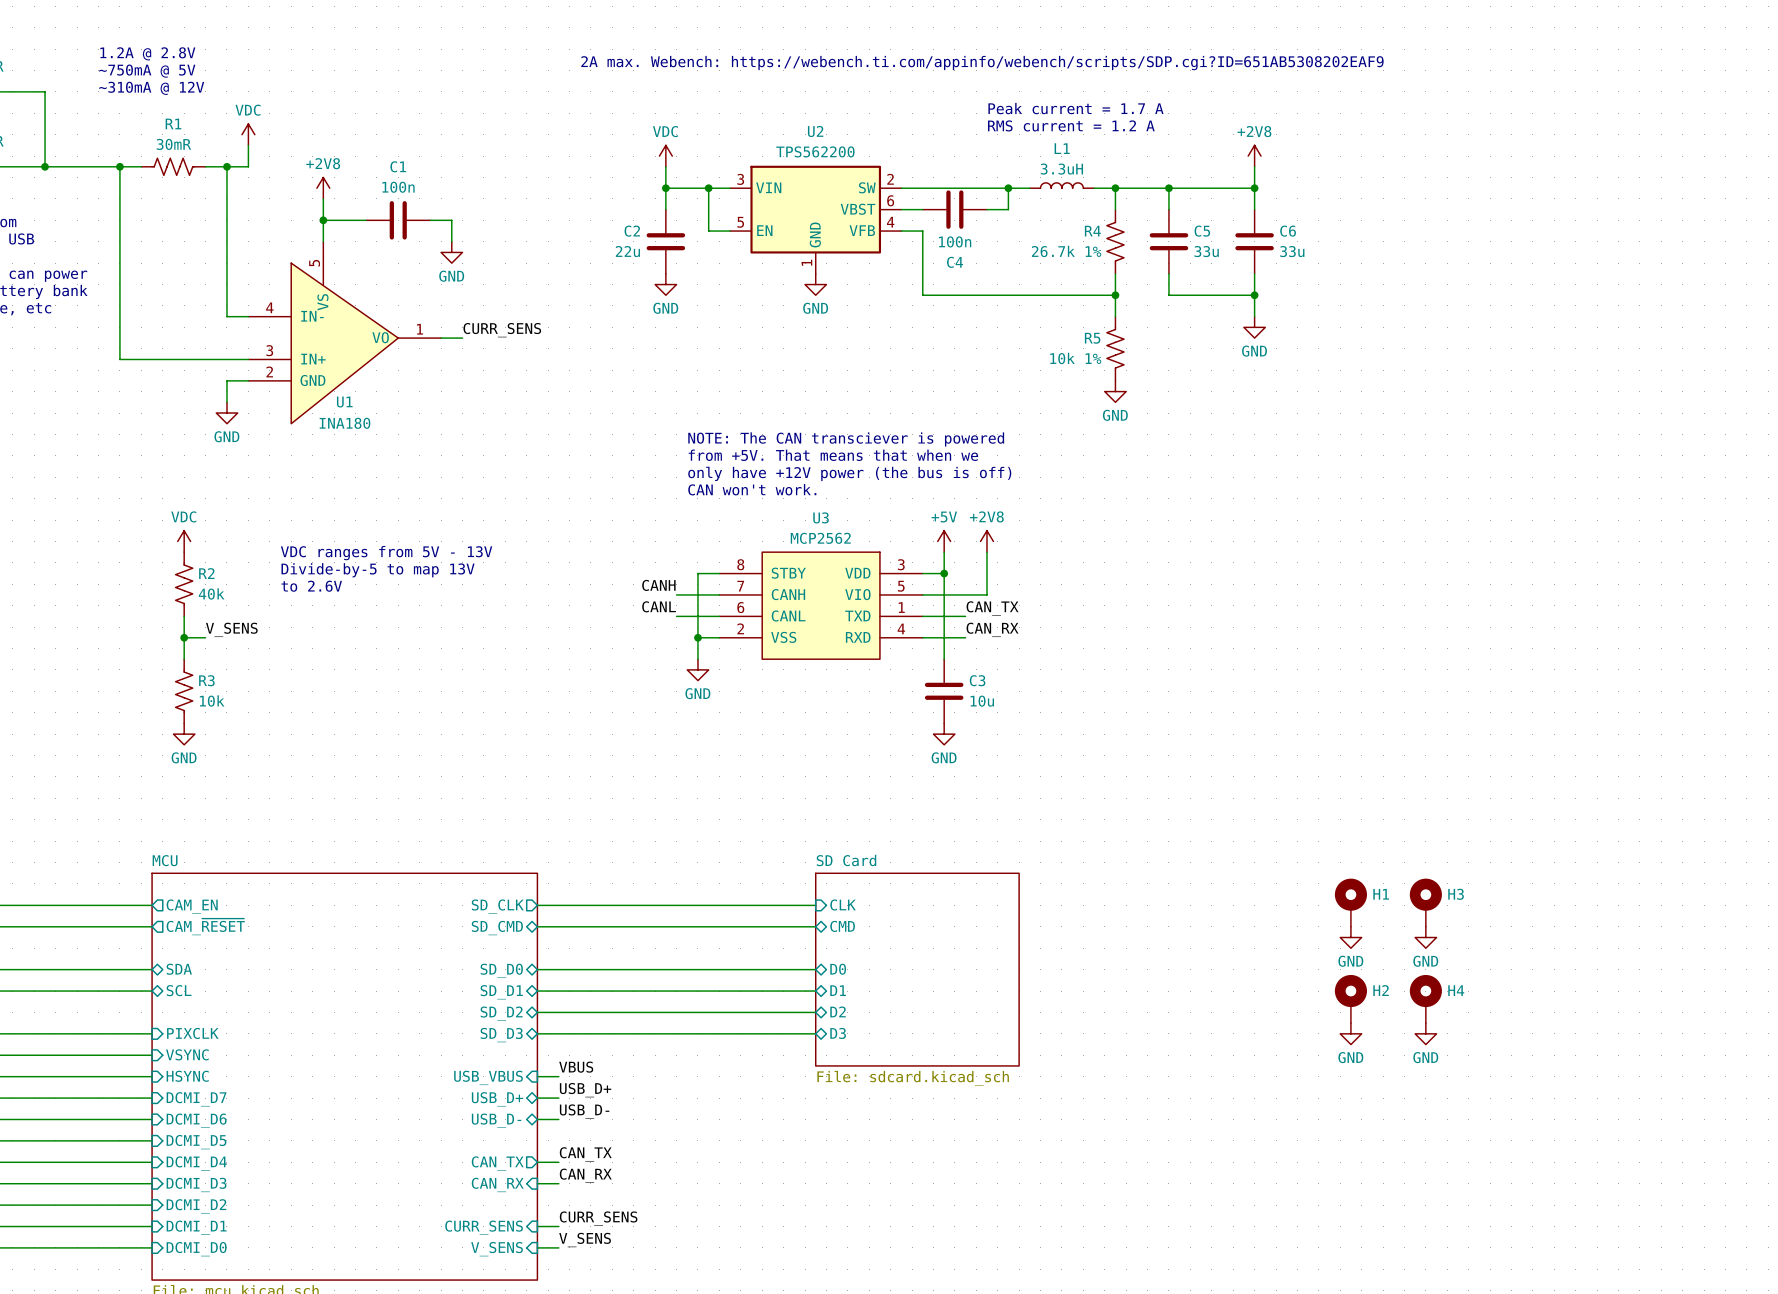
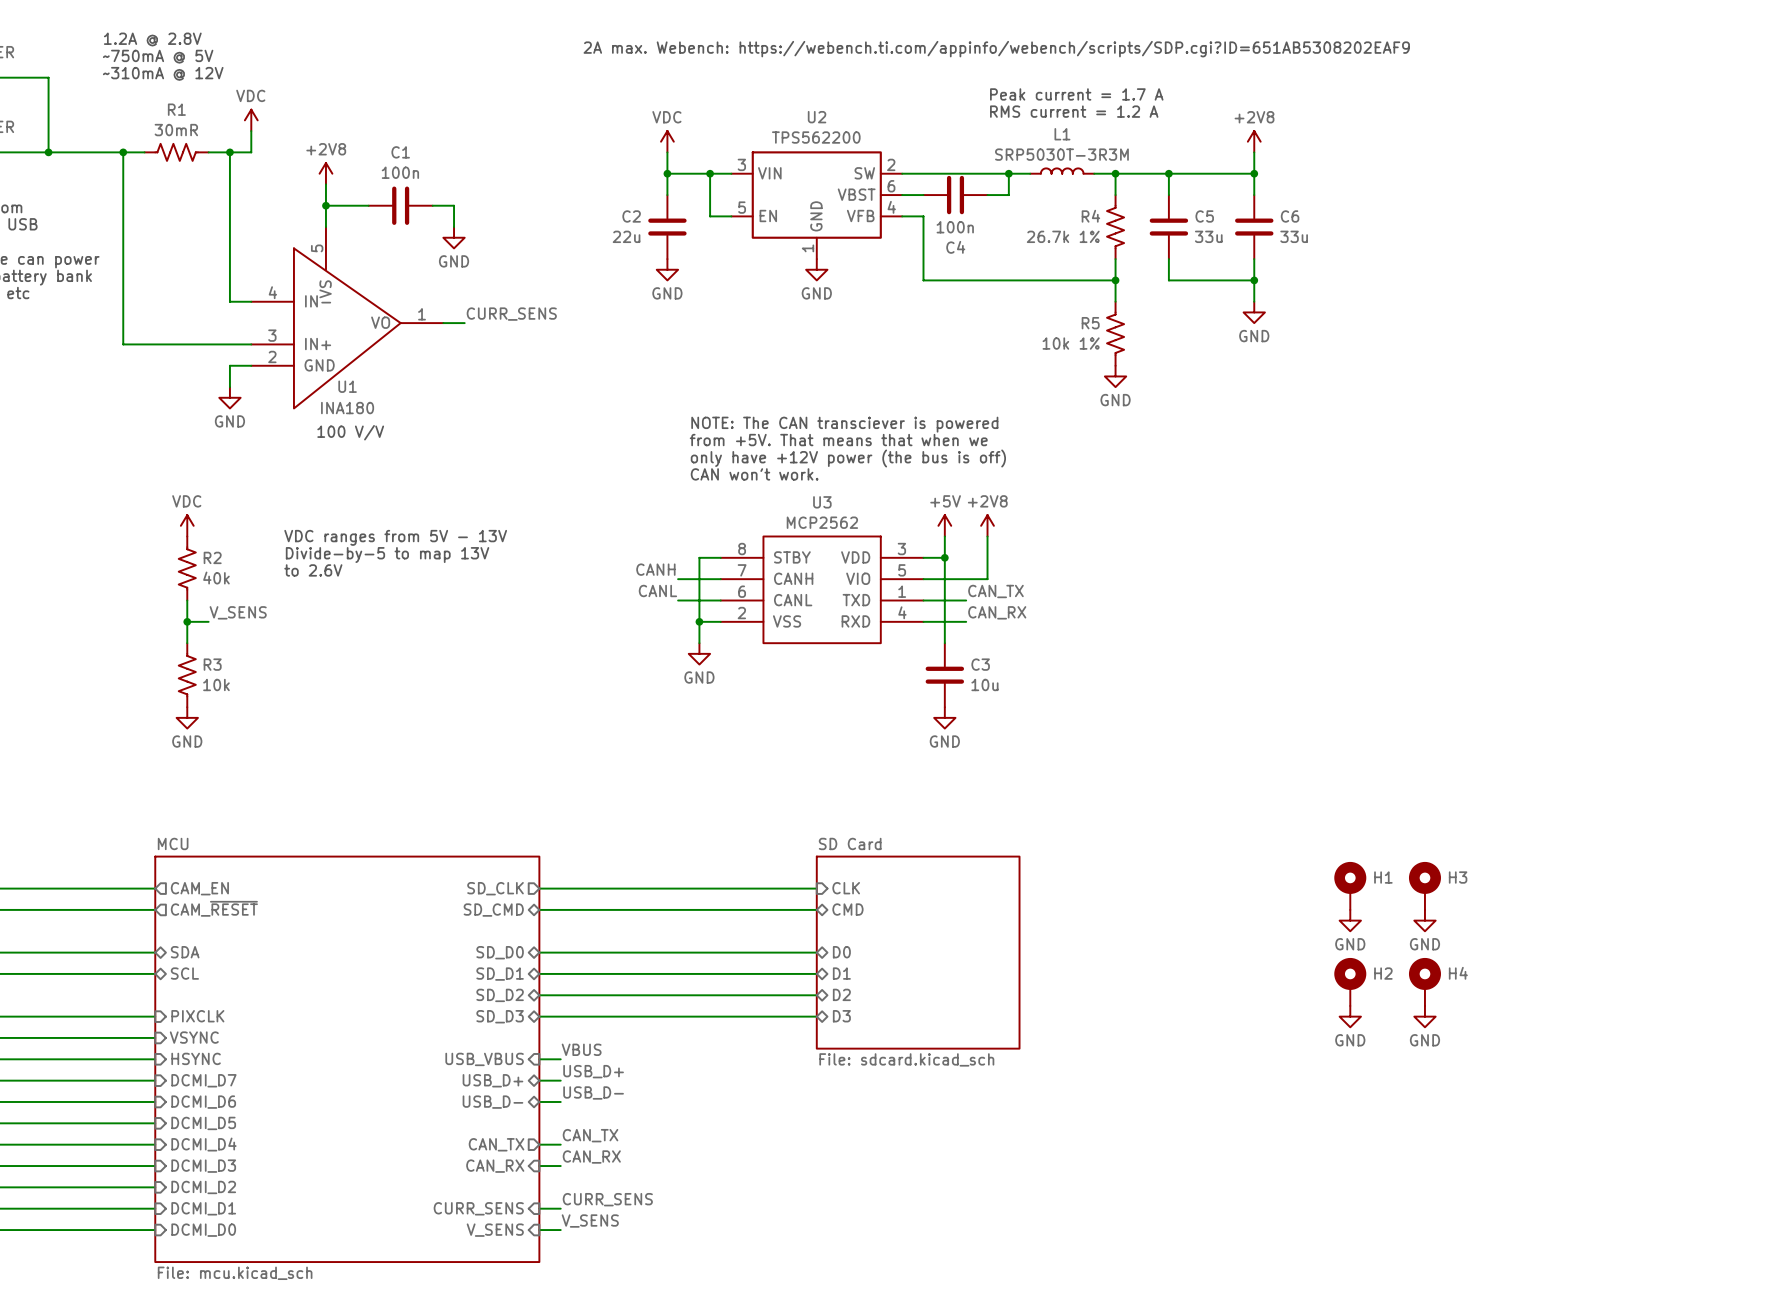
L1 value: 3.3uH (1061, 169) -> SRP5030T-3R3M (1061, 154)
text: none -> 100 V/V (350, 432)

